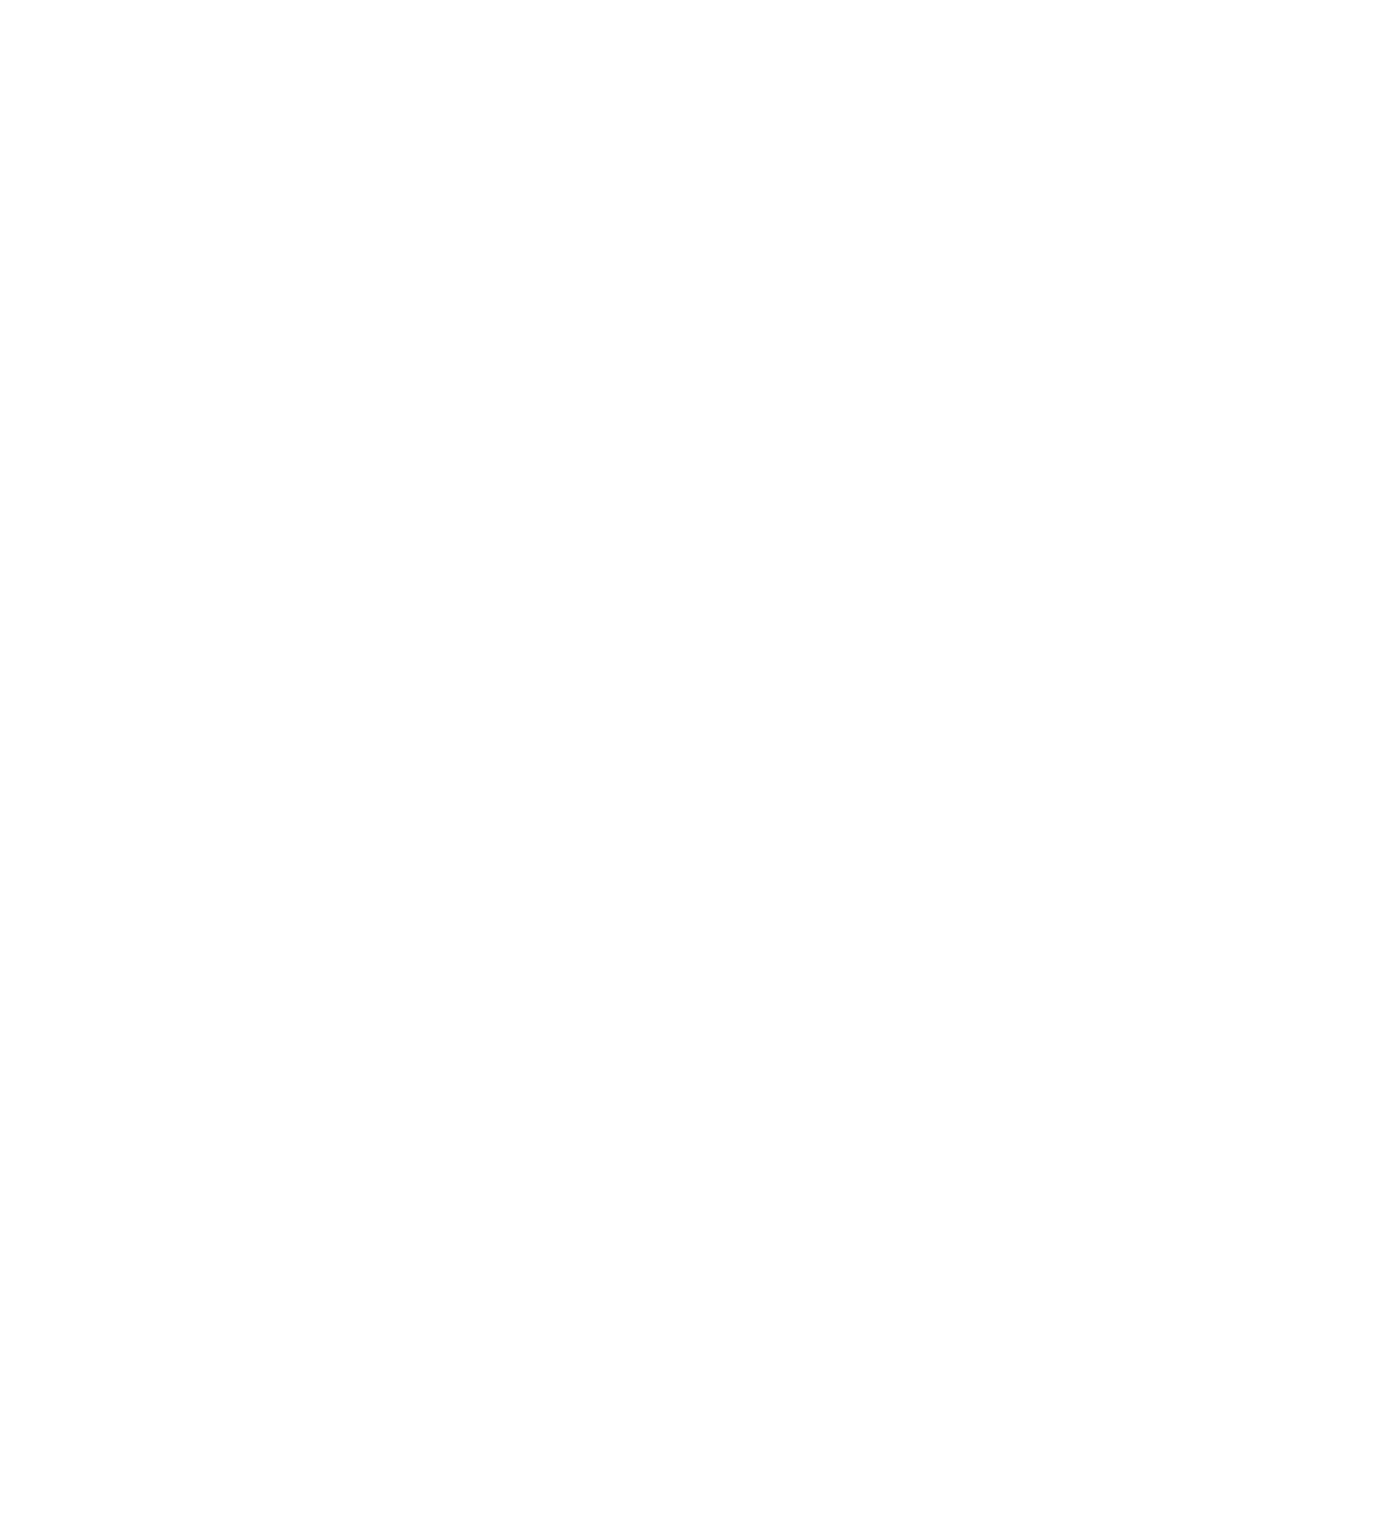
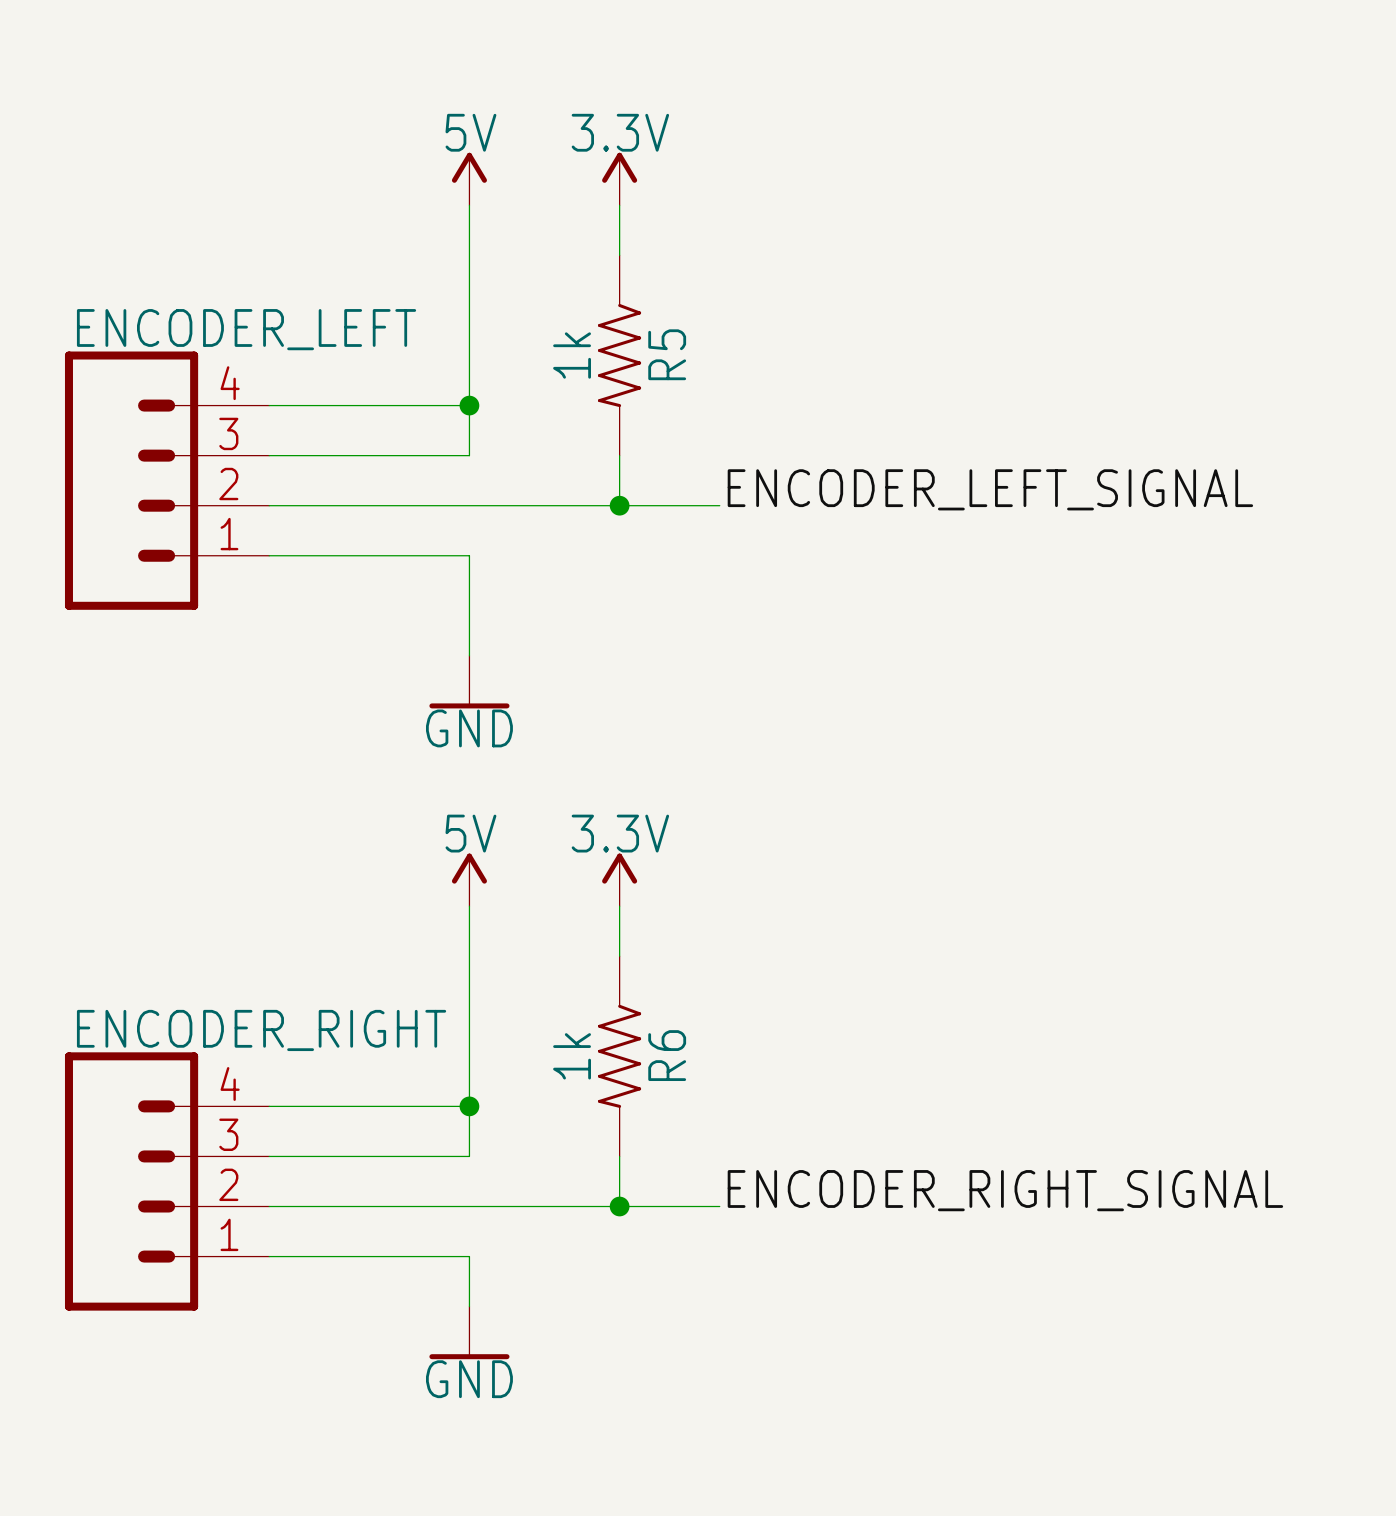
power symbol: none -> 5V (469, 179)
power symbol: none -> 3.3V (619, 179)
wire: none -> (469, 205) (469, 455) (269, 455)
wire: none -> (619, 205) (619, 255)
R5: none -> 1k (619, 355)
wire: none -> (269, 405) (469, 405)
junction: none -> (469, 405)
wire: none -> (619, 455) (619, 505)
ENCODER_LEFT: none -> (167, 480)
label: none -> ENCODER_LEFT_SIGNAL (990, 489)
wire: none -> (269, 505) (719, 505)
junction: none -> (619, 505)
wire: none -> (269, 555) (469, 555) (469, 655)
power symbol: none -> GND (469, 682)
power symbol: none -> 5V (469, 879)
power symbol: none -> 3.3V (619, 879)
wire: none -> (469, 906) (469, 1156) (269, 1156)
wire: none -> (619, 906) (619, 956)
R6: none -> 1k (619, 1056)
wire: none -> (269, 1106) (469, 1106)
junction: none -> (469, 1106)
wire: none -> (619, 1156) (619, 1206)
ENCODER_RIGHT: none -> (167, 1181)
label: none -> ENCODER_RIGHT_SIGNAL (1005, 1190)
wire: none -> (269, 1206) (719, 1206)
junction: none -> (619, 1206)
wire: none -> (269, 1256) (469, 1256) (469, 1306)
power symbol: none -> GND (469, 1332)

